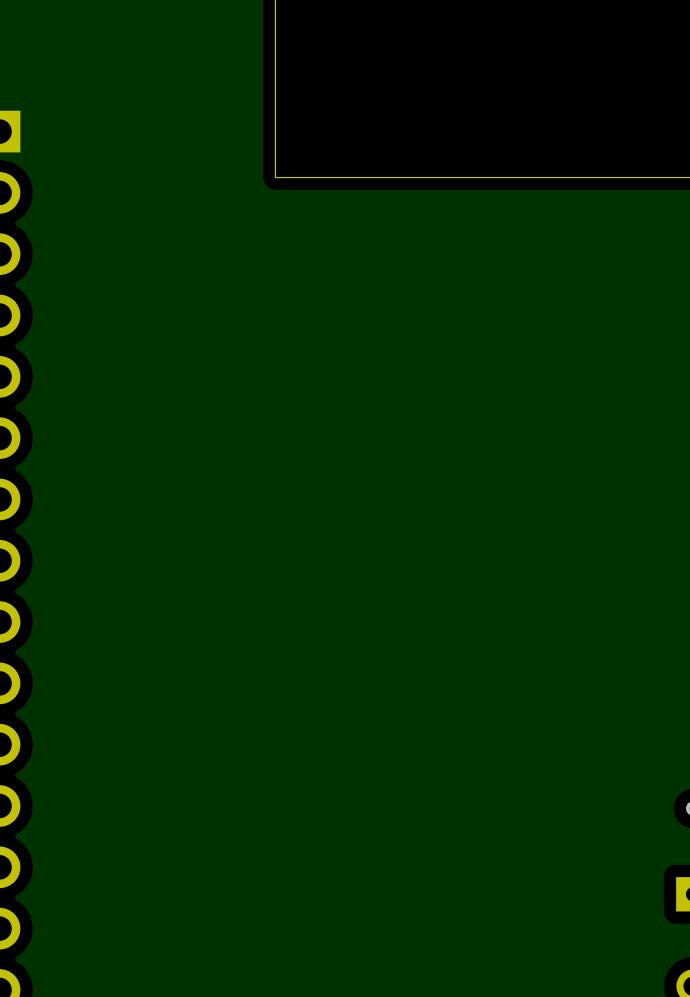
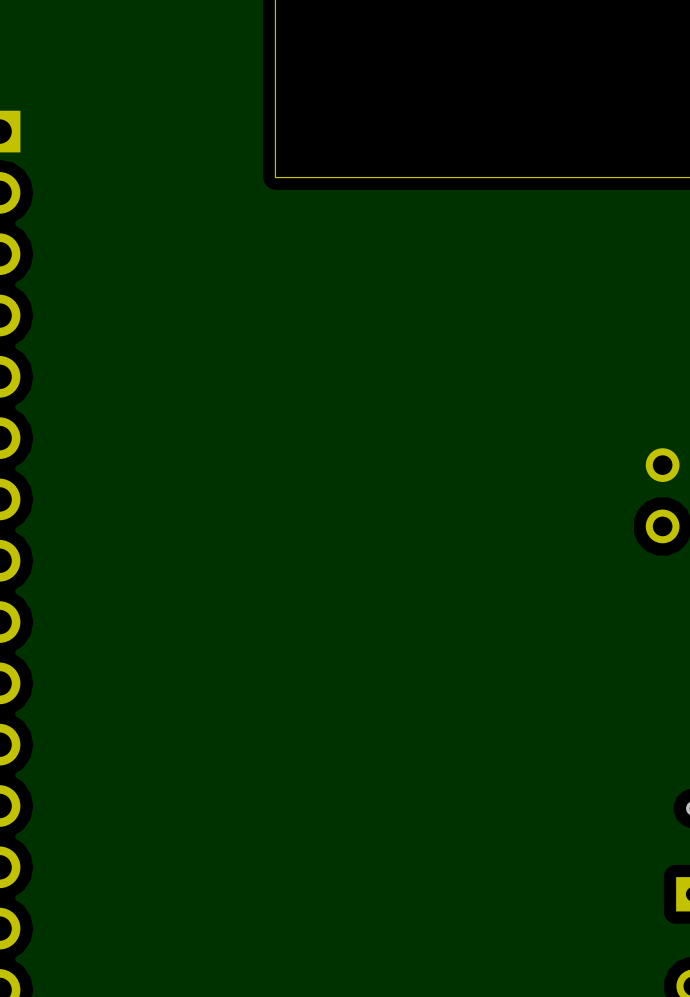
part: none -> (662, 495)

